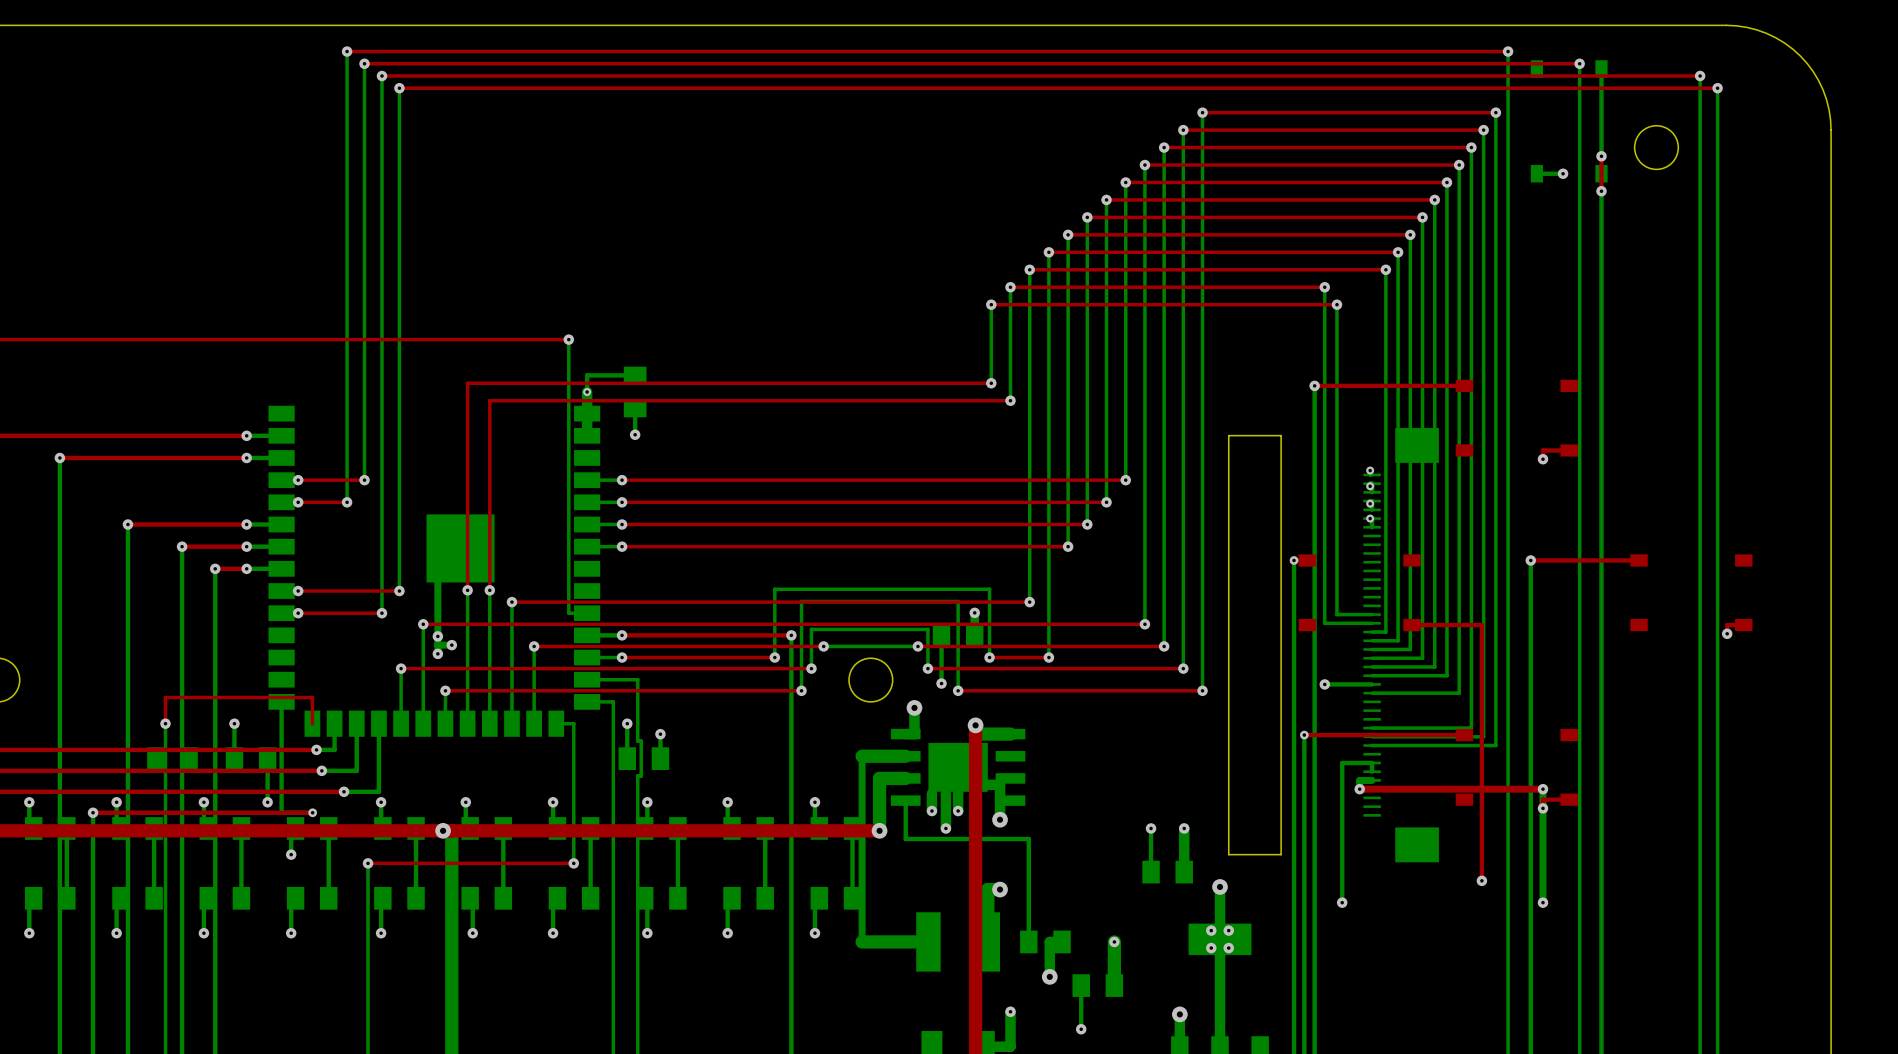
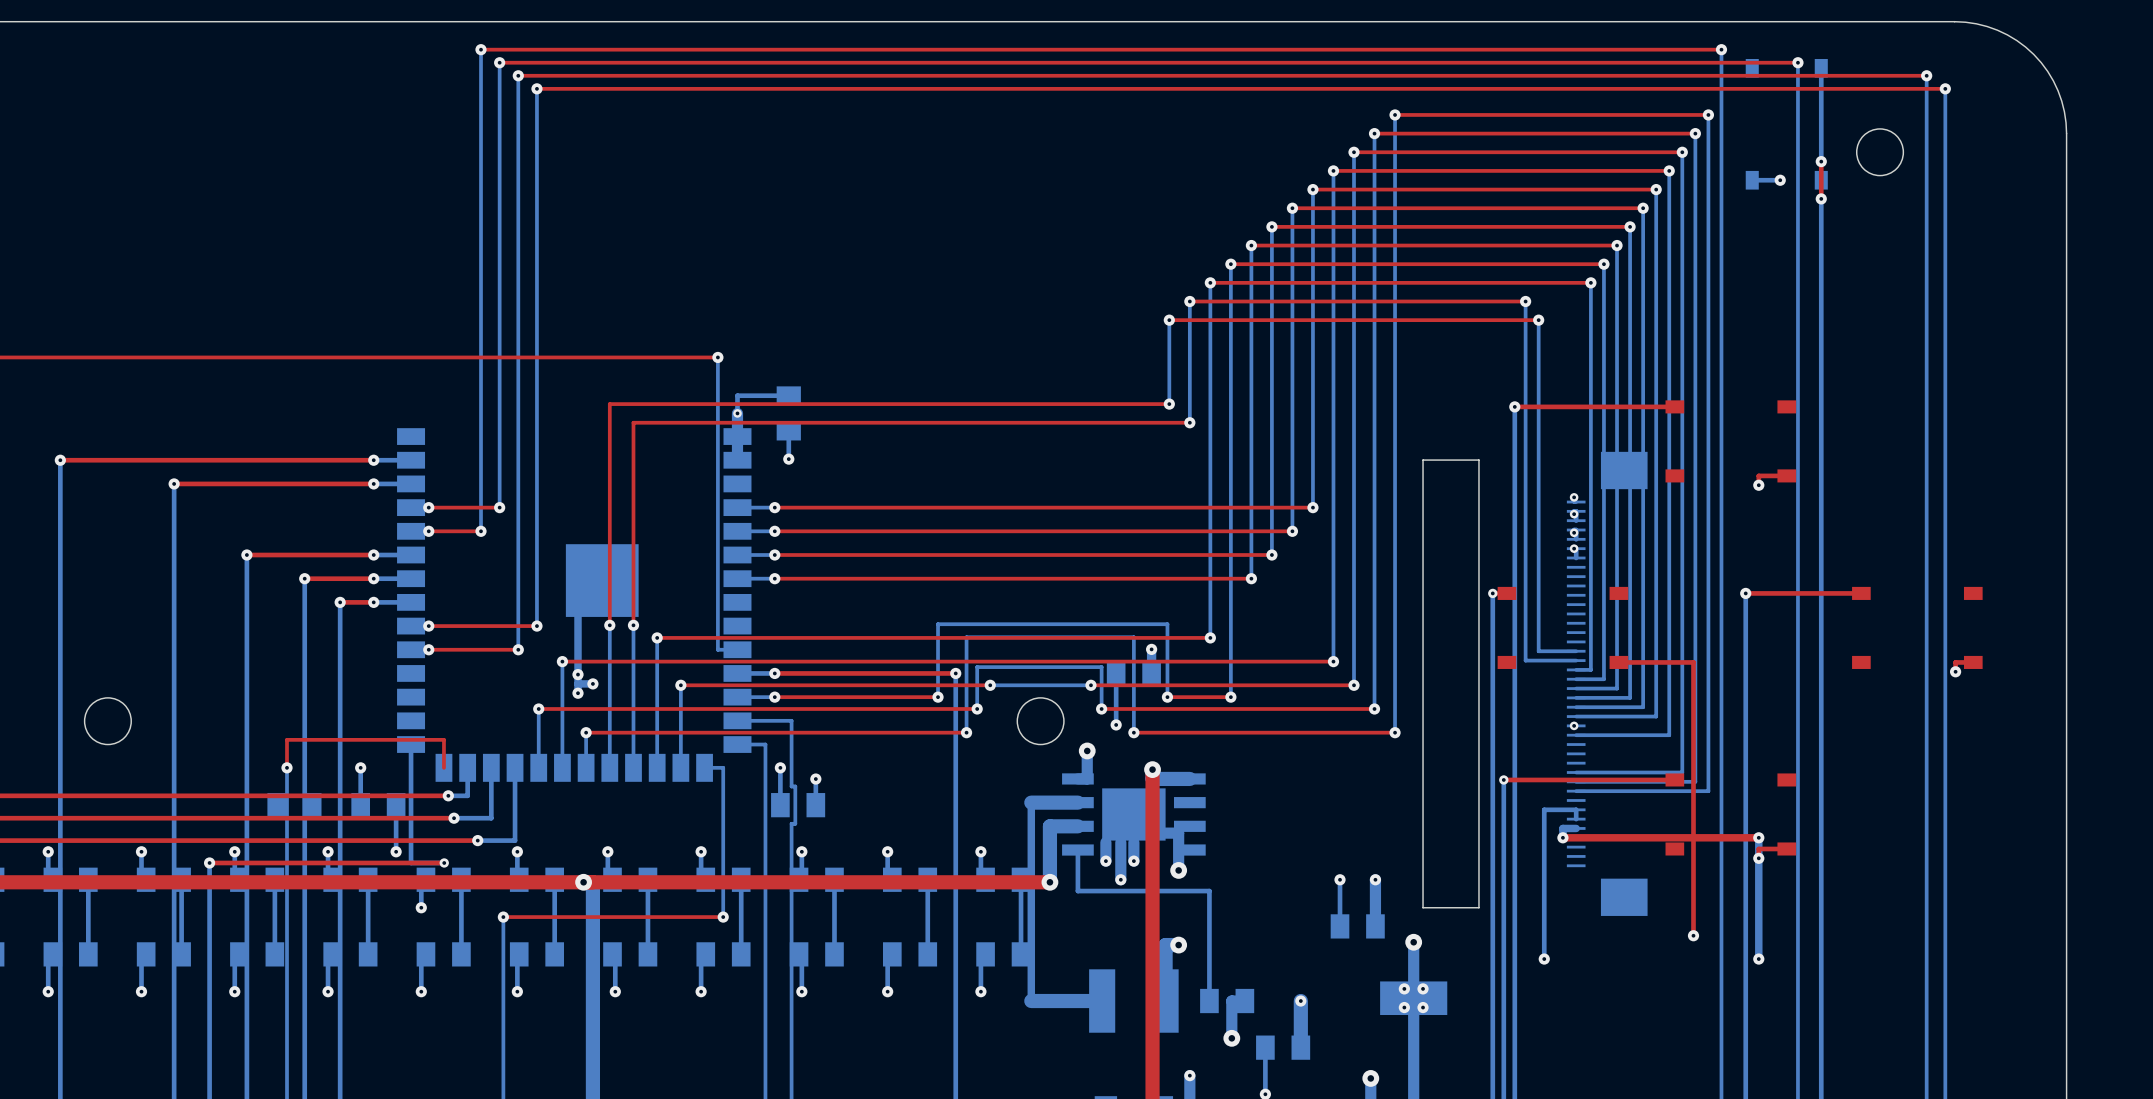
bottom track: (1324, 684) (1370, 684) -> none
via: (1324, 684) -> none
via: none -> (1574, 725)

